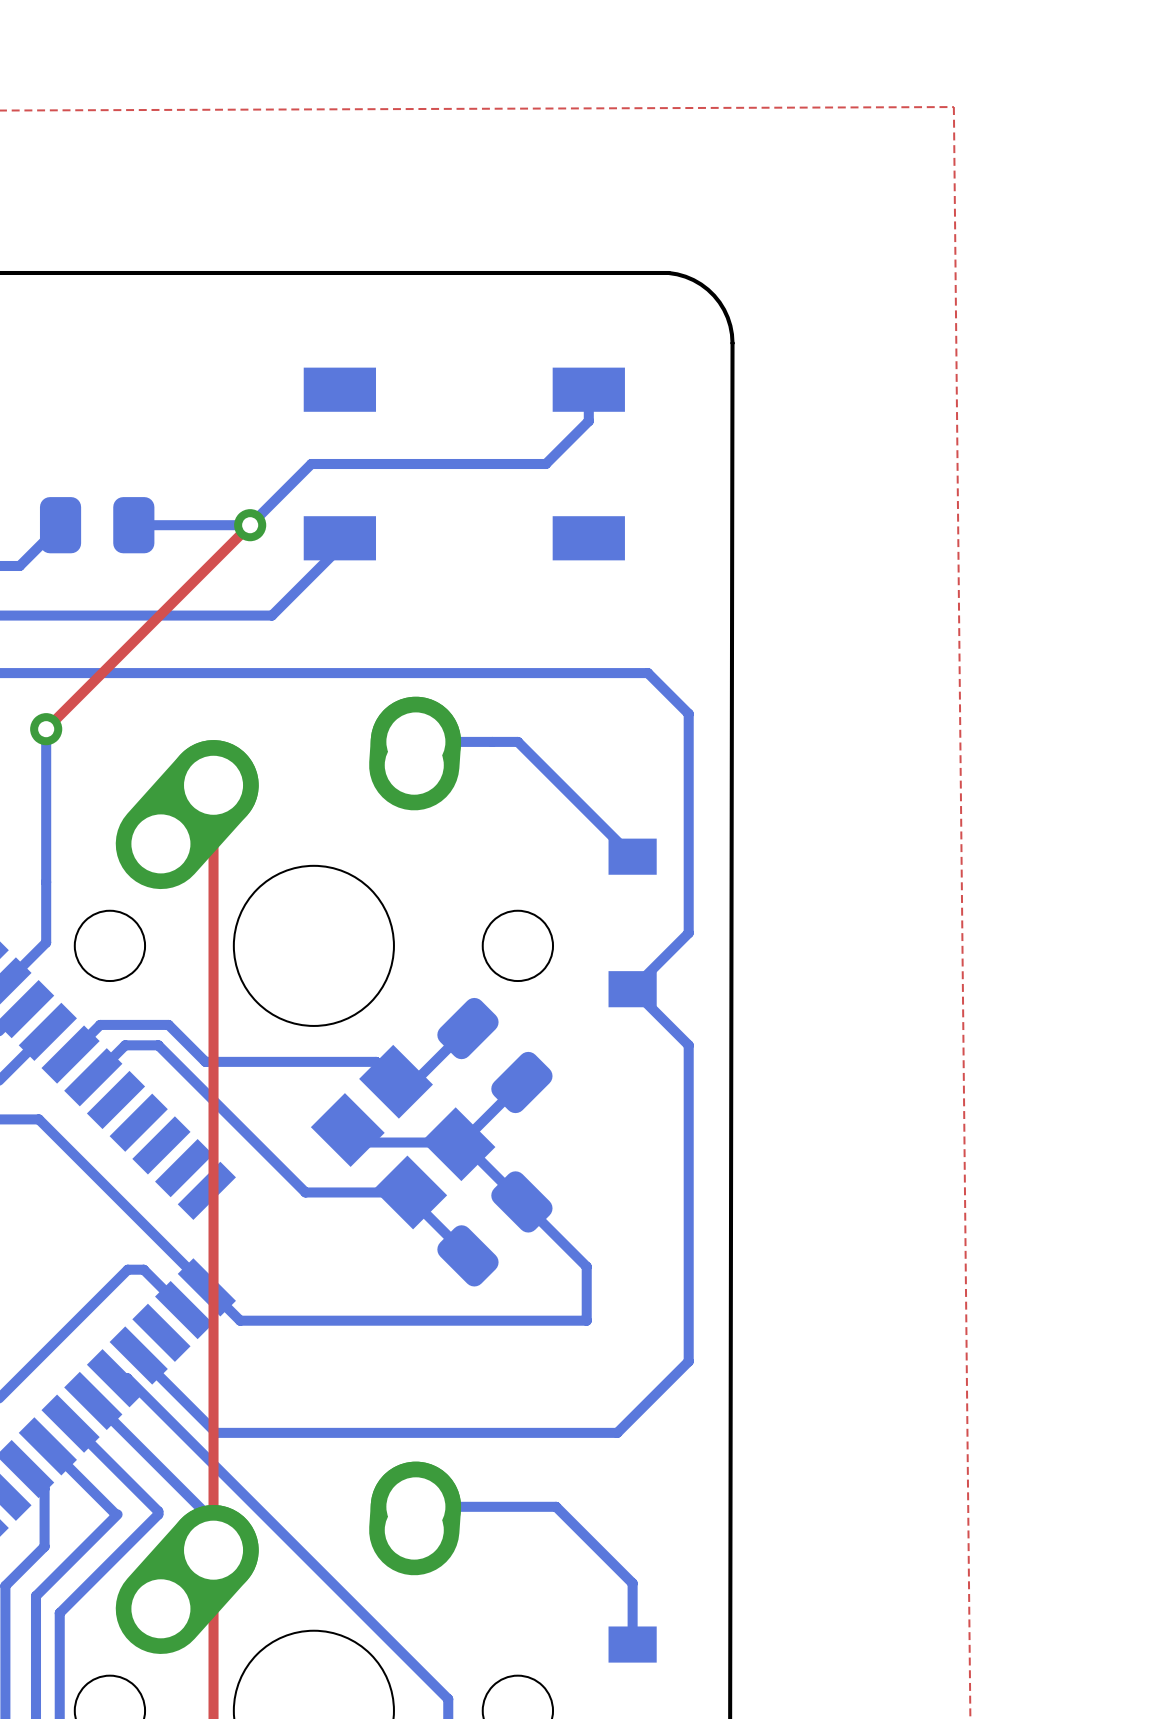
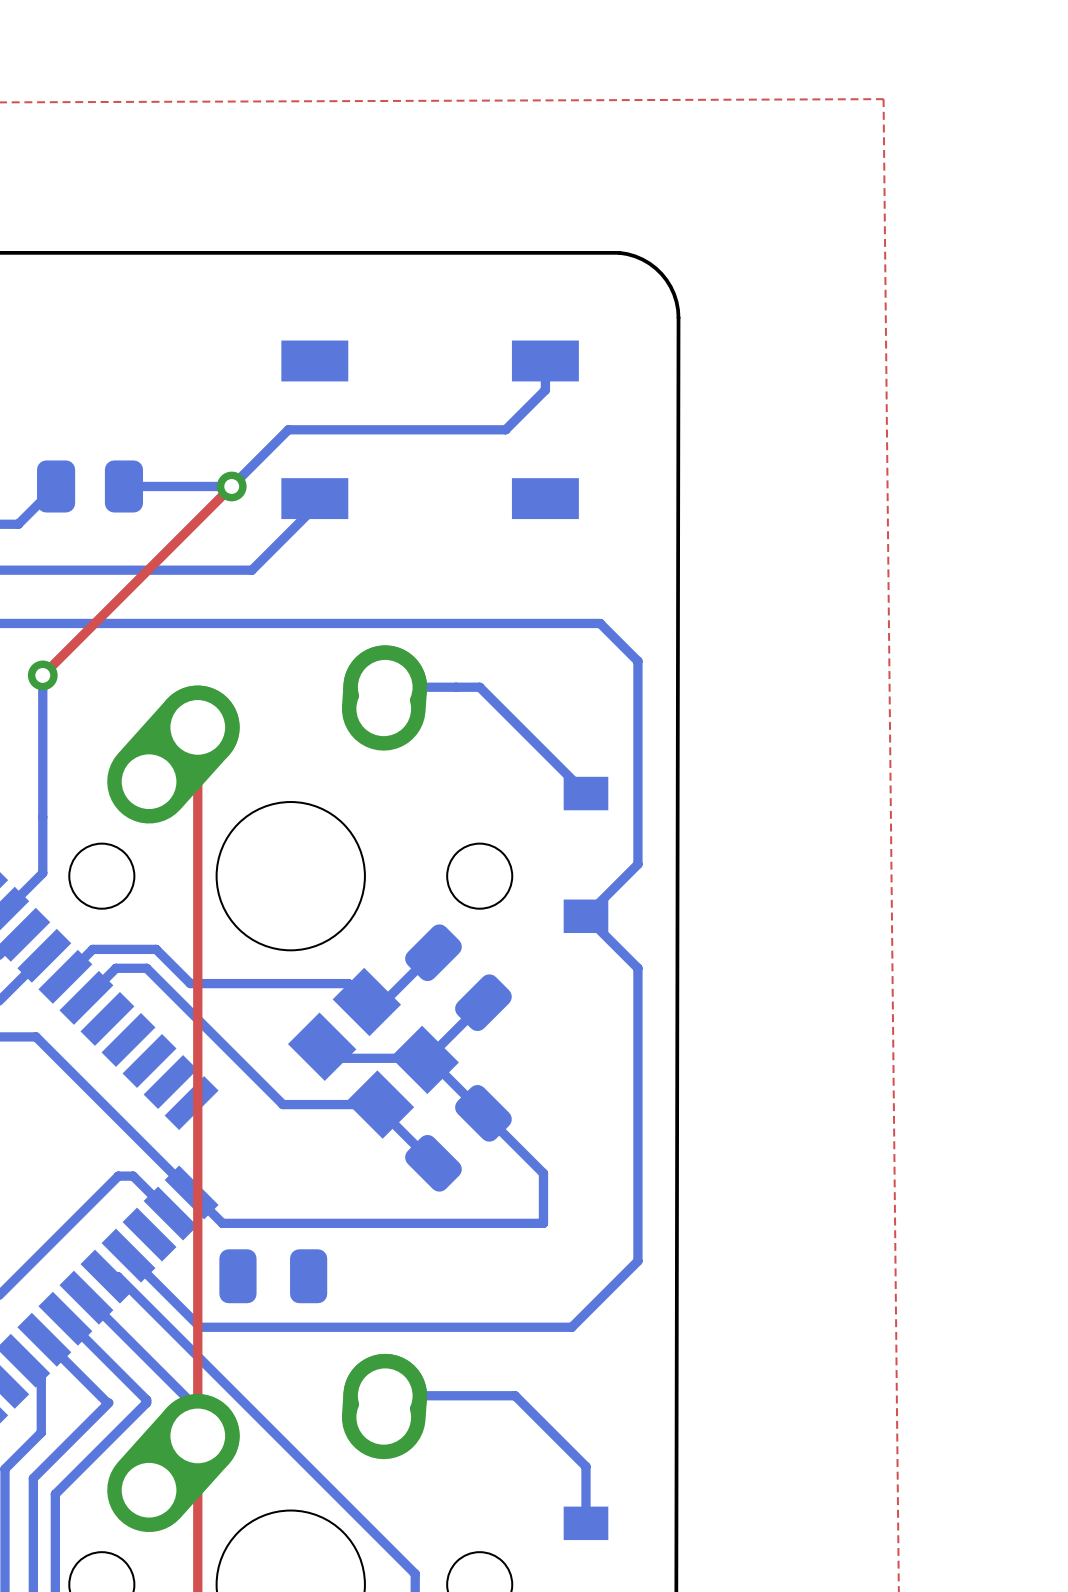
part: none -> (273, 1276)

